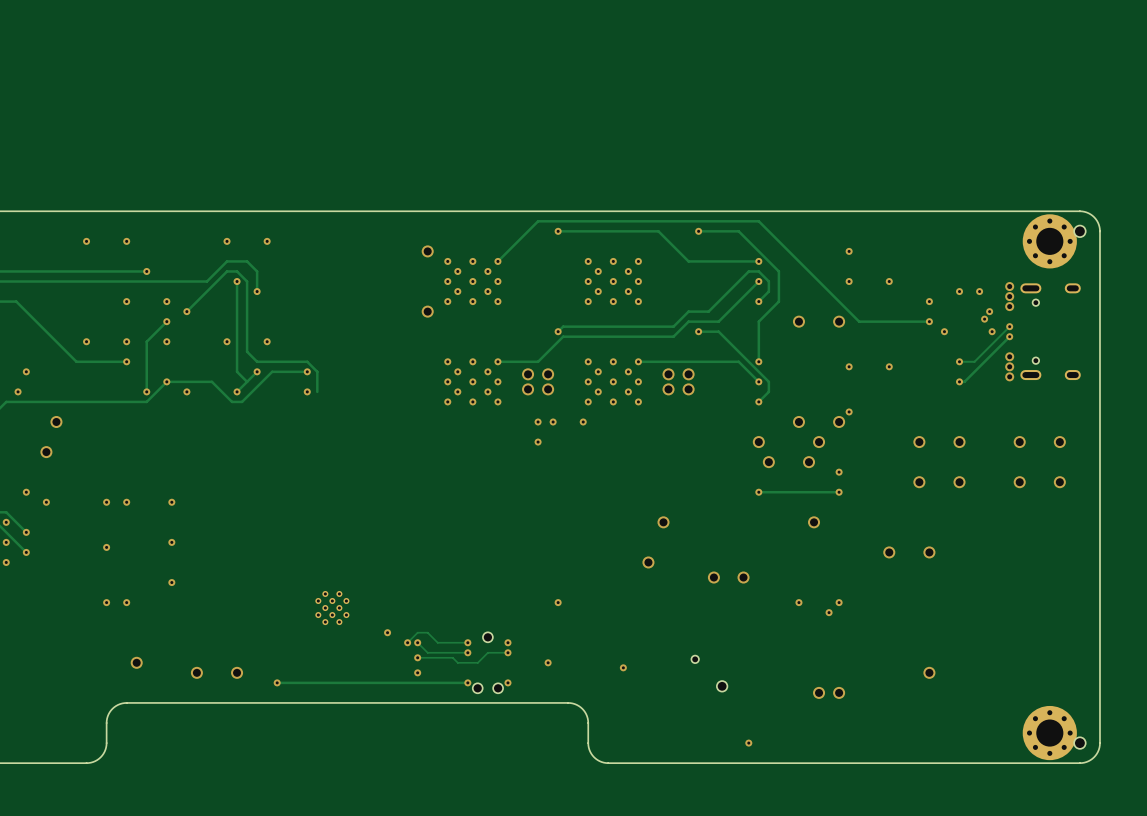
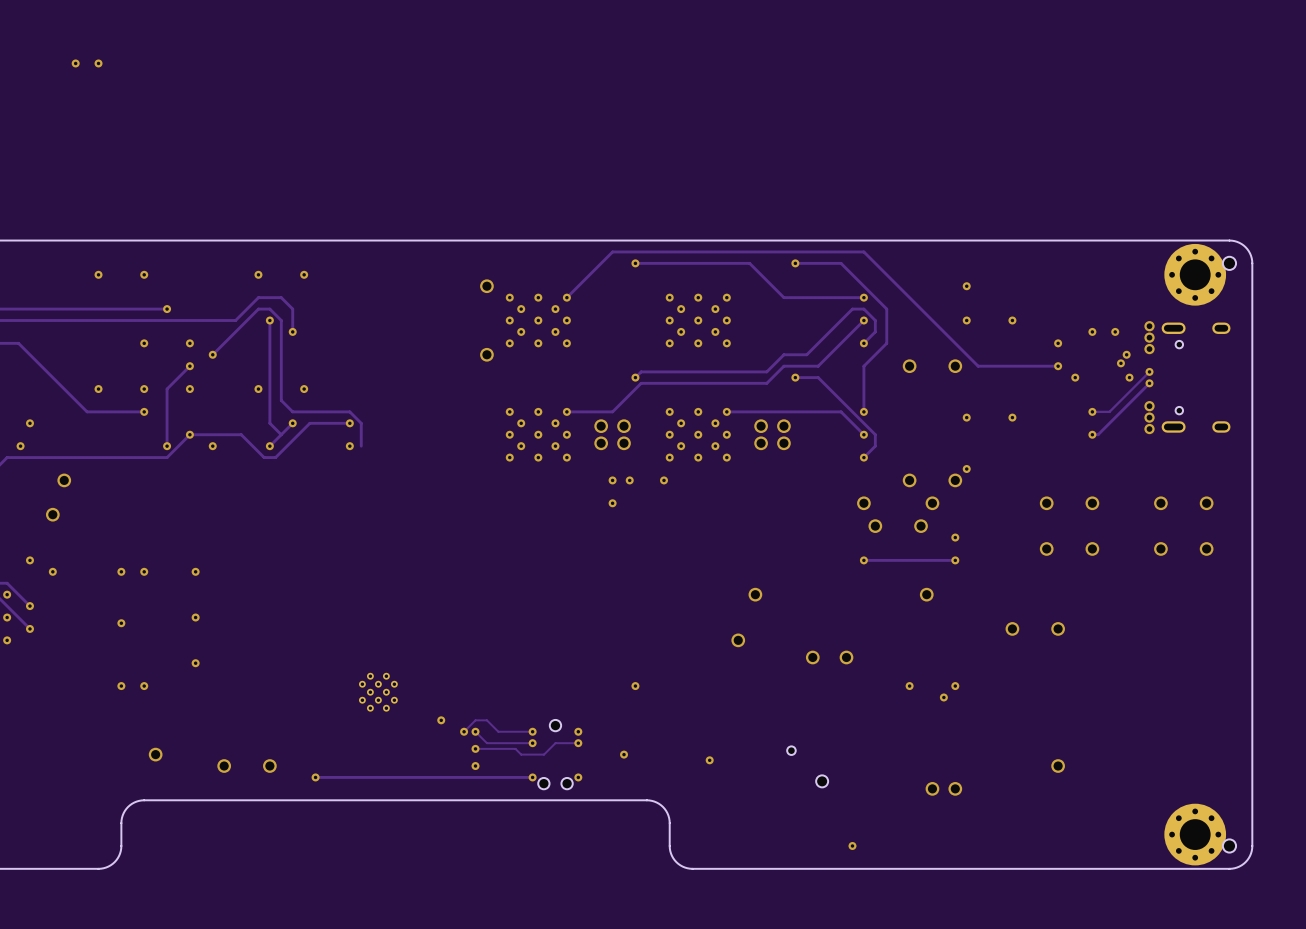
via: none -> (75, 63)
via: none -> (98, 63)

